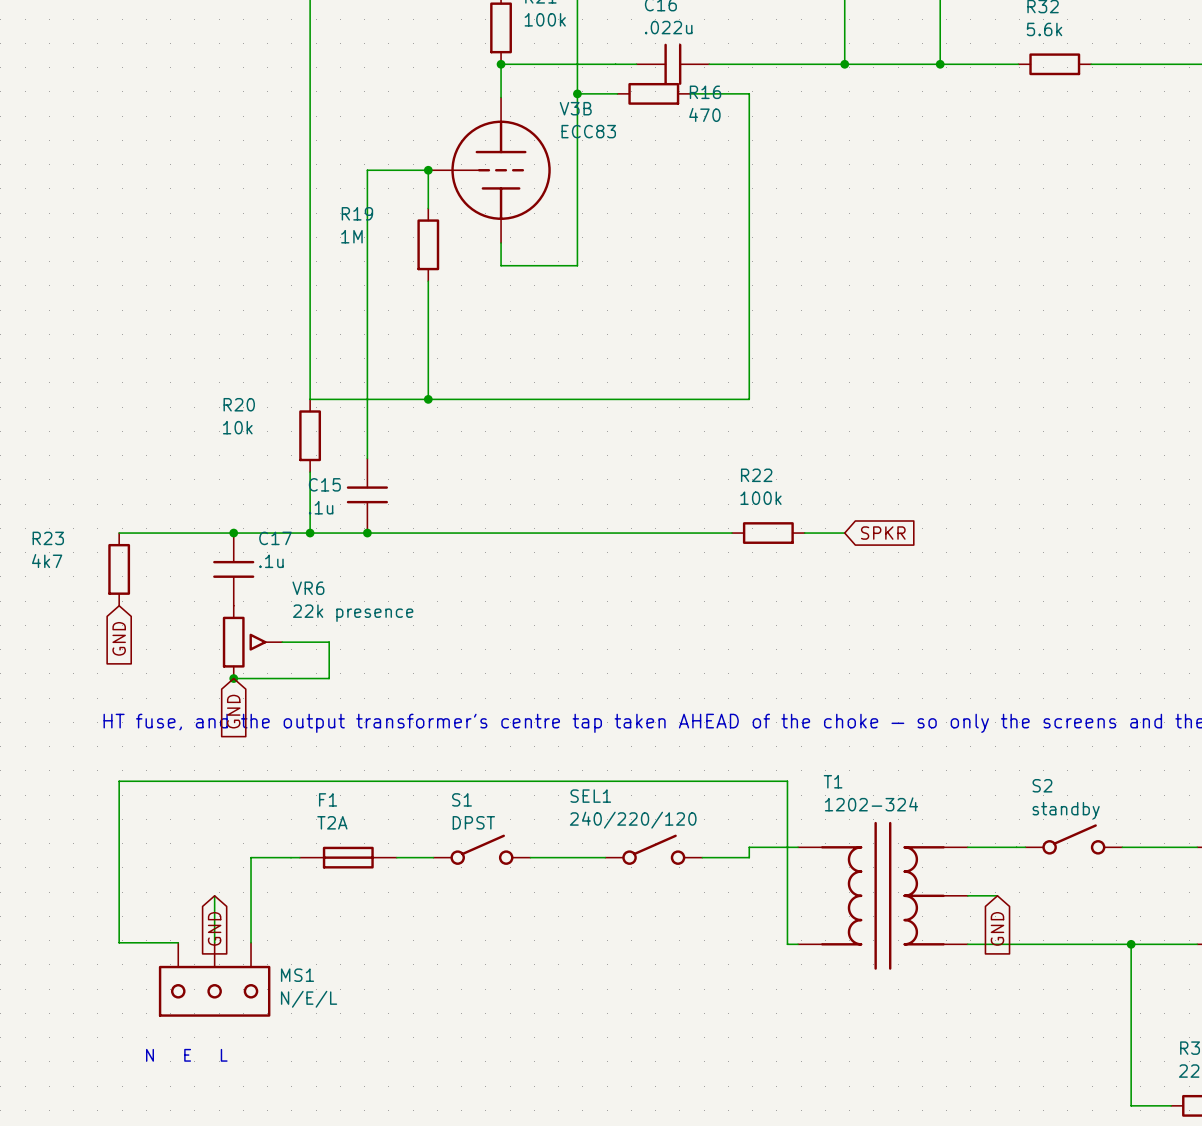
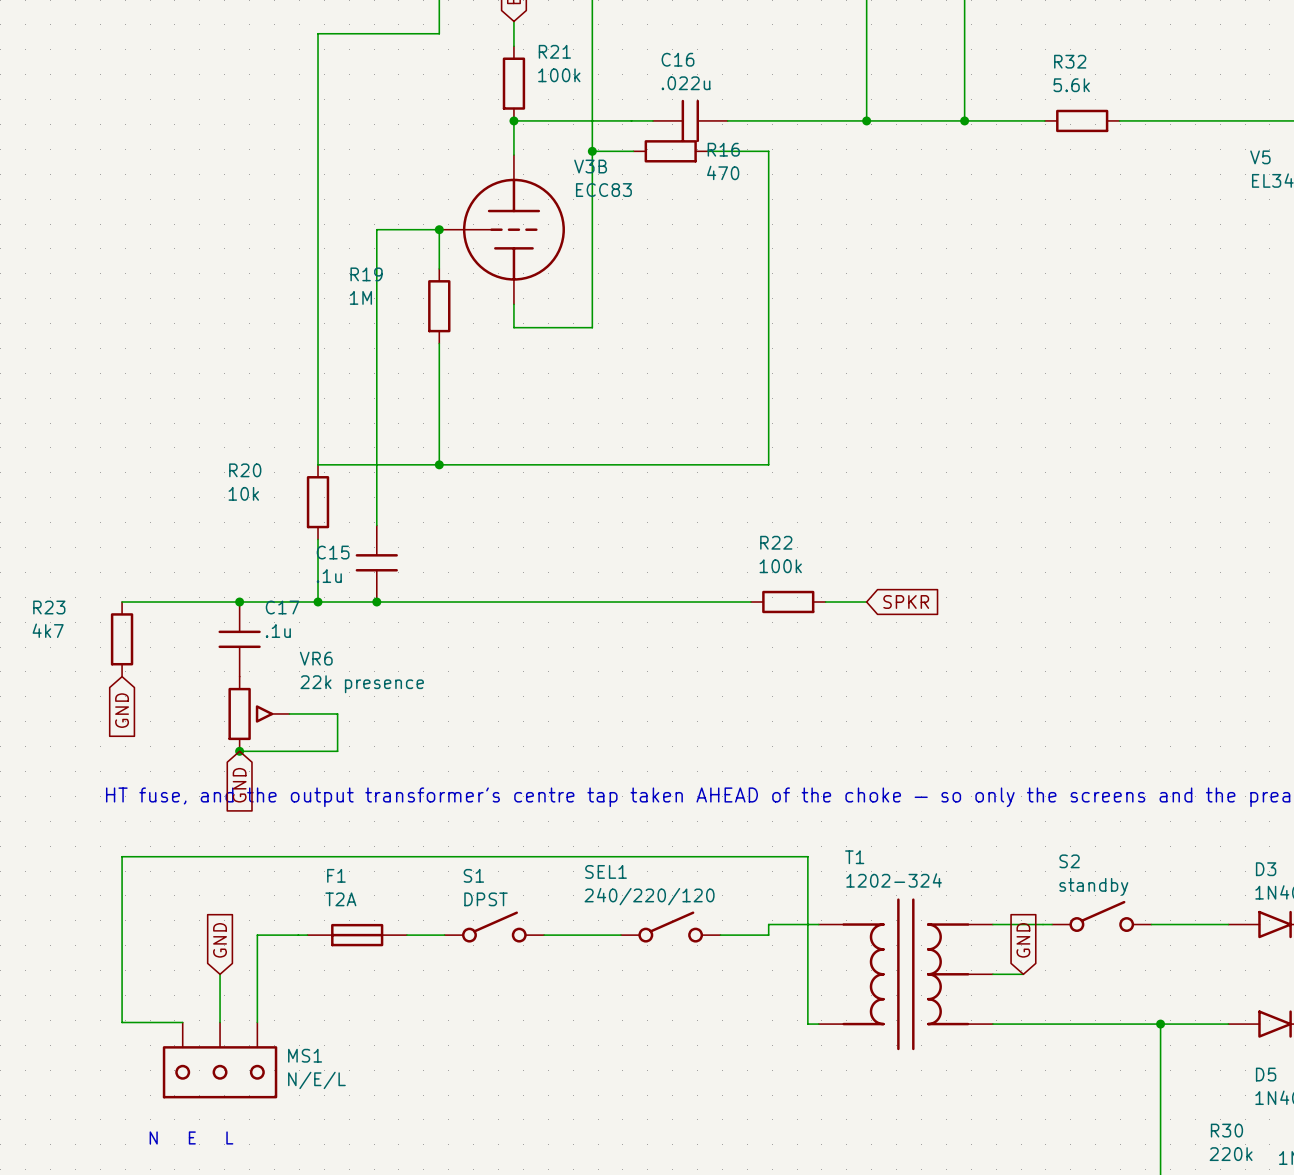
global label rotation: 0° (214, 928) -> 180° (220, 940)
global label rotation: 0° (997, 928) -> 180° (1023, 940)

